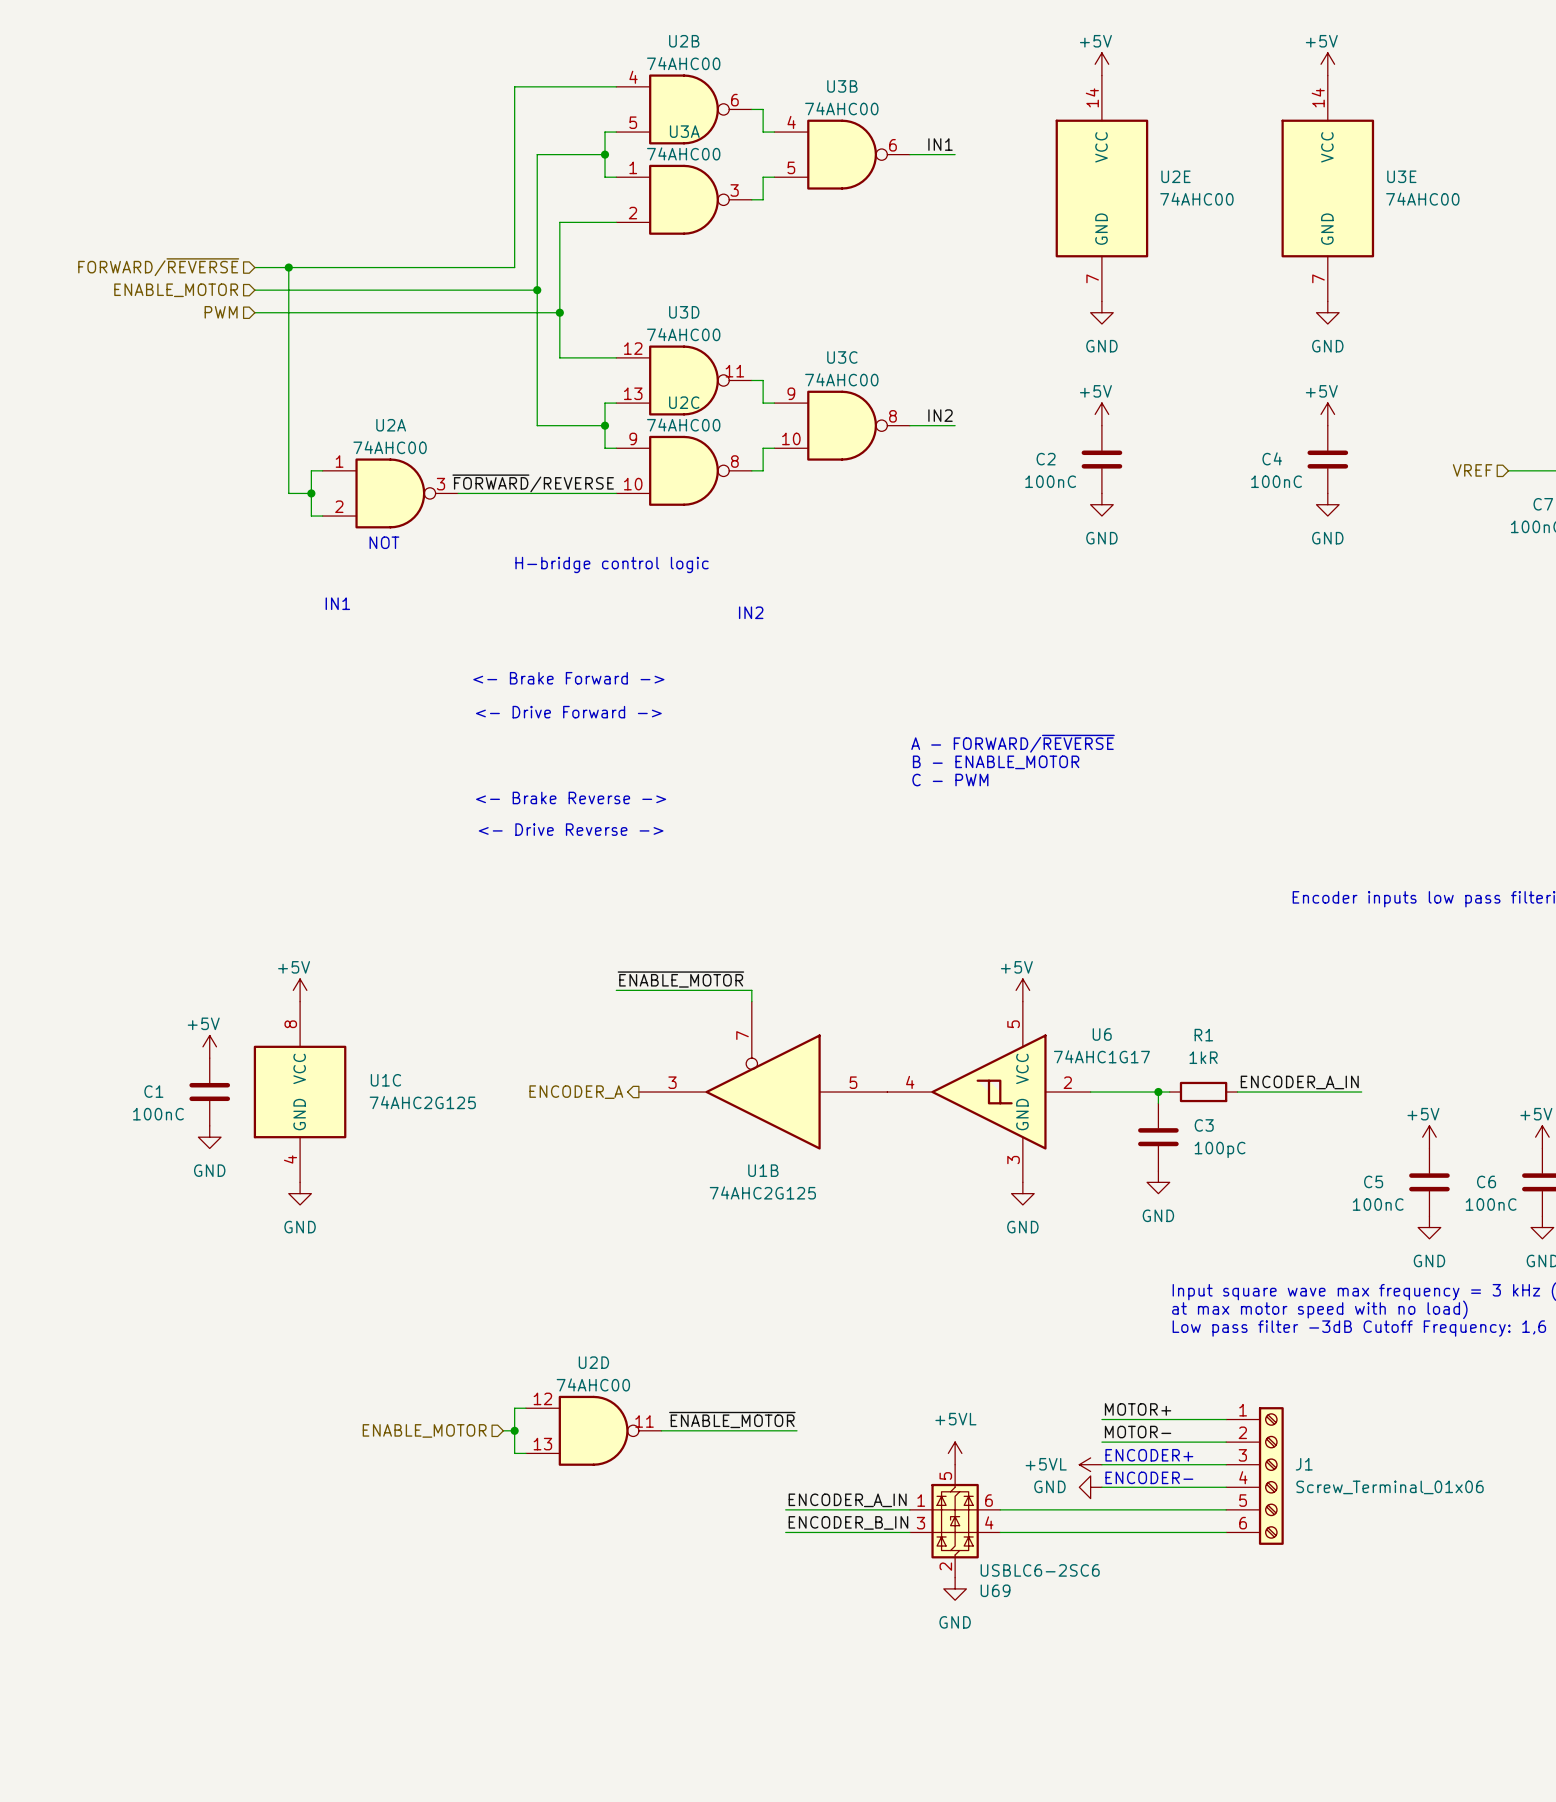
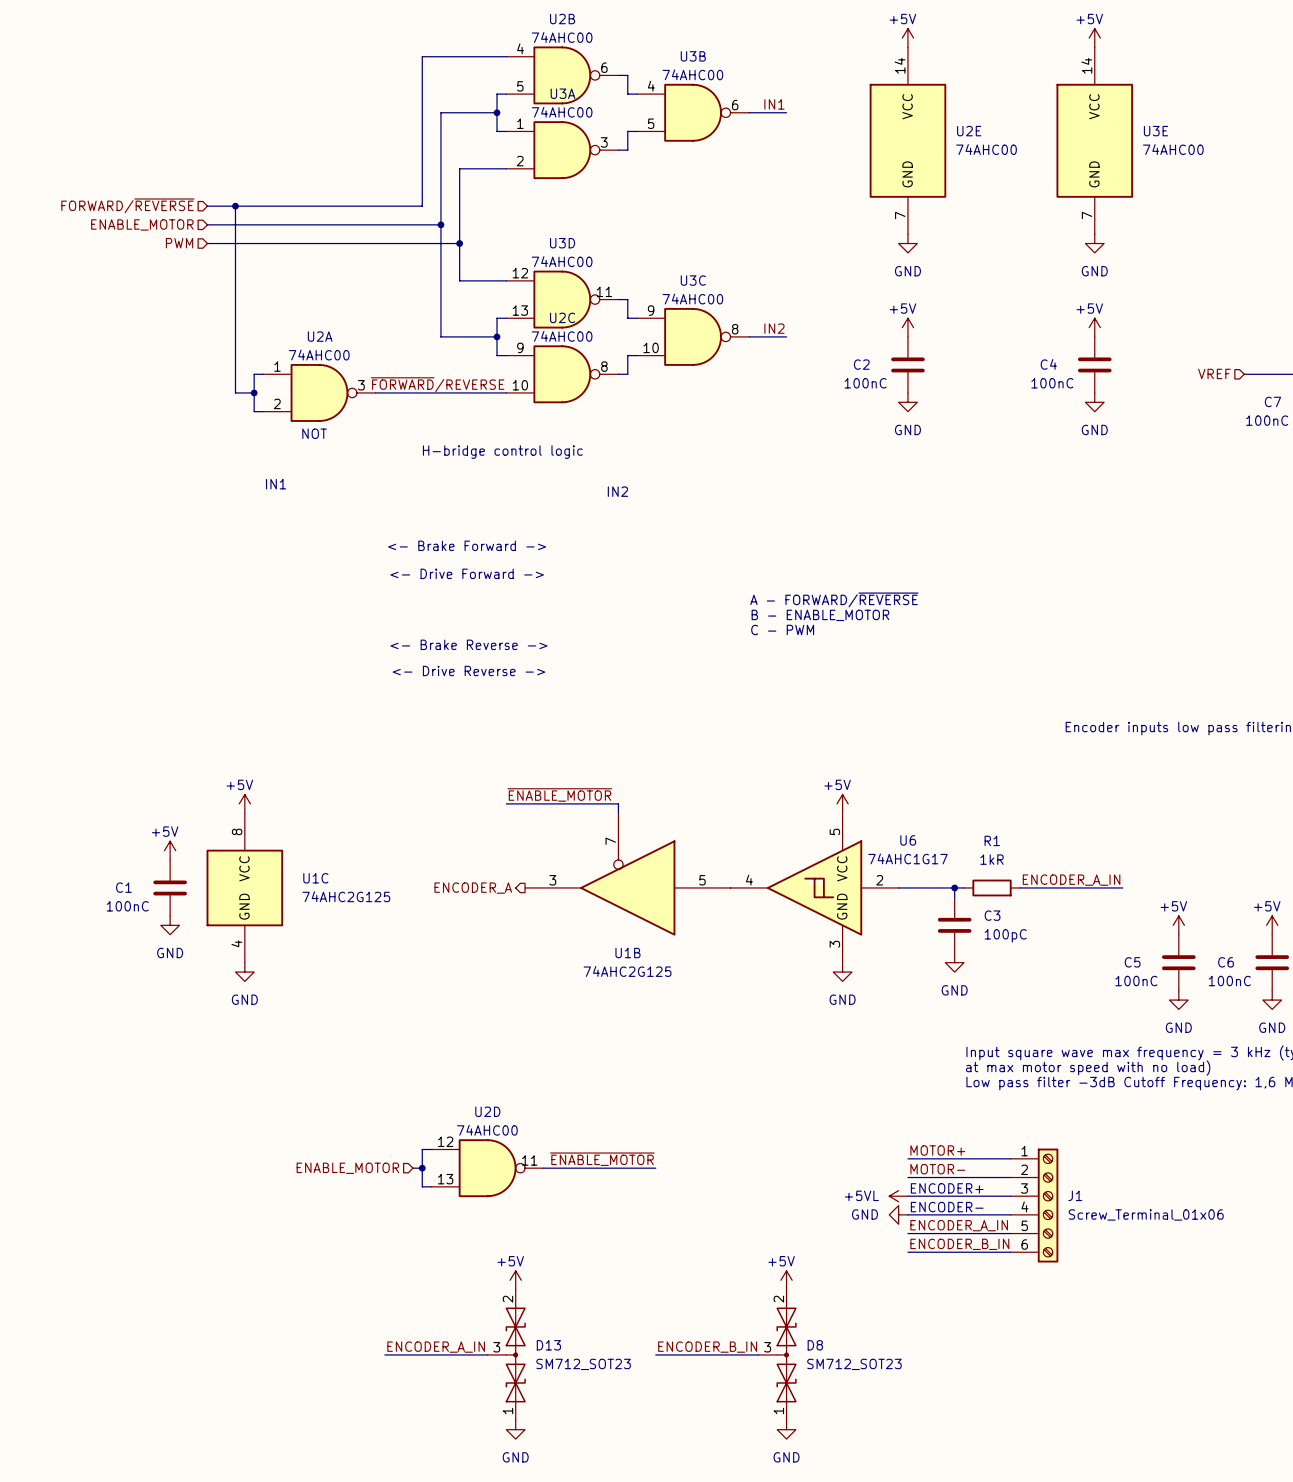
power symbol: +5VL (955, 1453) -> none
label: ENCODER_A_IN (847, 1500) -> none
label: none -> ENCODER_A_IN (959, 1225)
wire: (785, 1509) (909, 1509) -> none
wire: (1000, 1509) (1101, 1509) -> none
U69: USBLC6-2SC6 (955, 1521) -> none
label position: ENCODER_B_IN (848, 1522) -> ENCODER_B_IN (707, 1347)
label: none -> ENCODER_B_IN (959, 1244)
wire: (785, 1532) (909, 1532) -> (655, 1354) (758, 1354)
wire: (1000, 1532) (1101, 1532) -> none
power symbol: none -> +5V (515, 1280)
power symbol: none -> +5V (786, 1280)
power symbol position: GND (955, 1588) -> GND (786, 1429)
label: none -> ENCODER_A_IN (436, 1347)
wire: none -> (384, 1354) (487, 1354)
D13: none -> SM712_SOT23 (506, 1354)
D8: none -> SM712_SOT23 (777, 1354)
power symbol: none -> GND (515, 1429)

